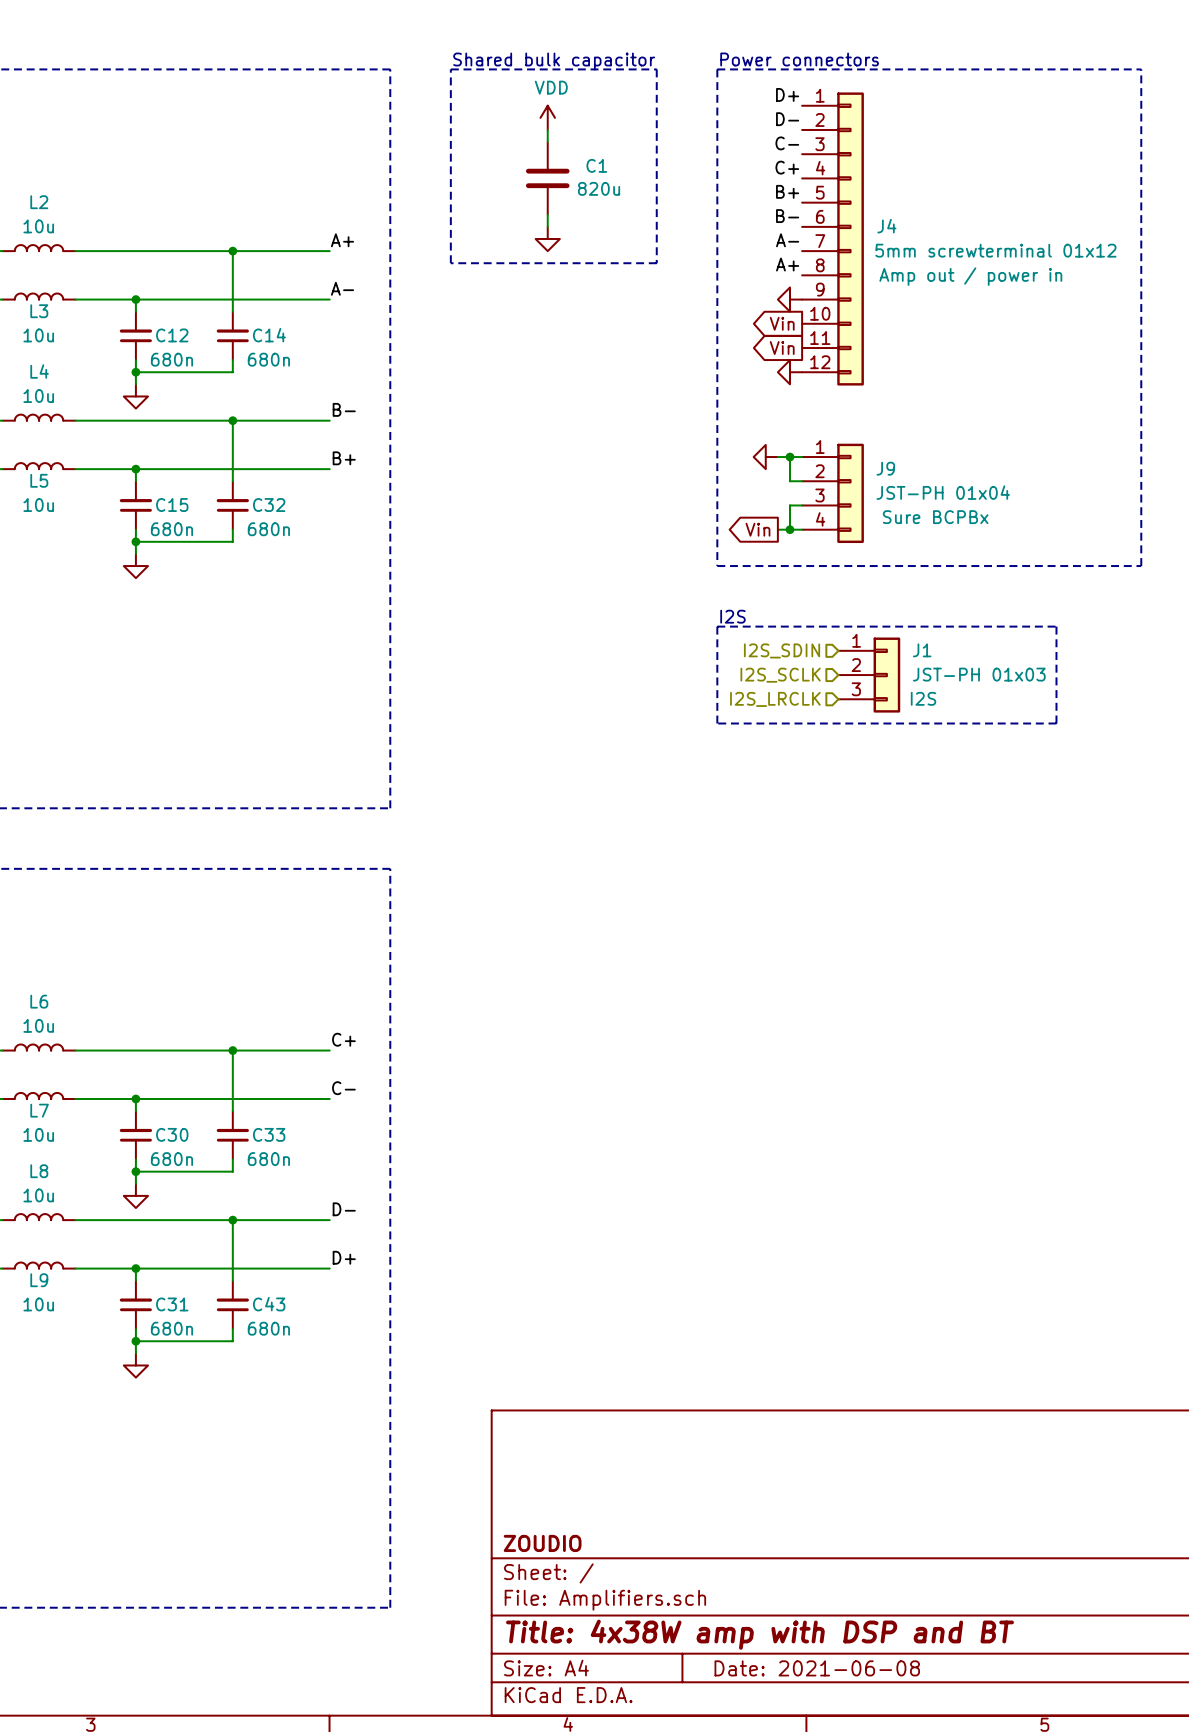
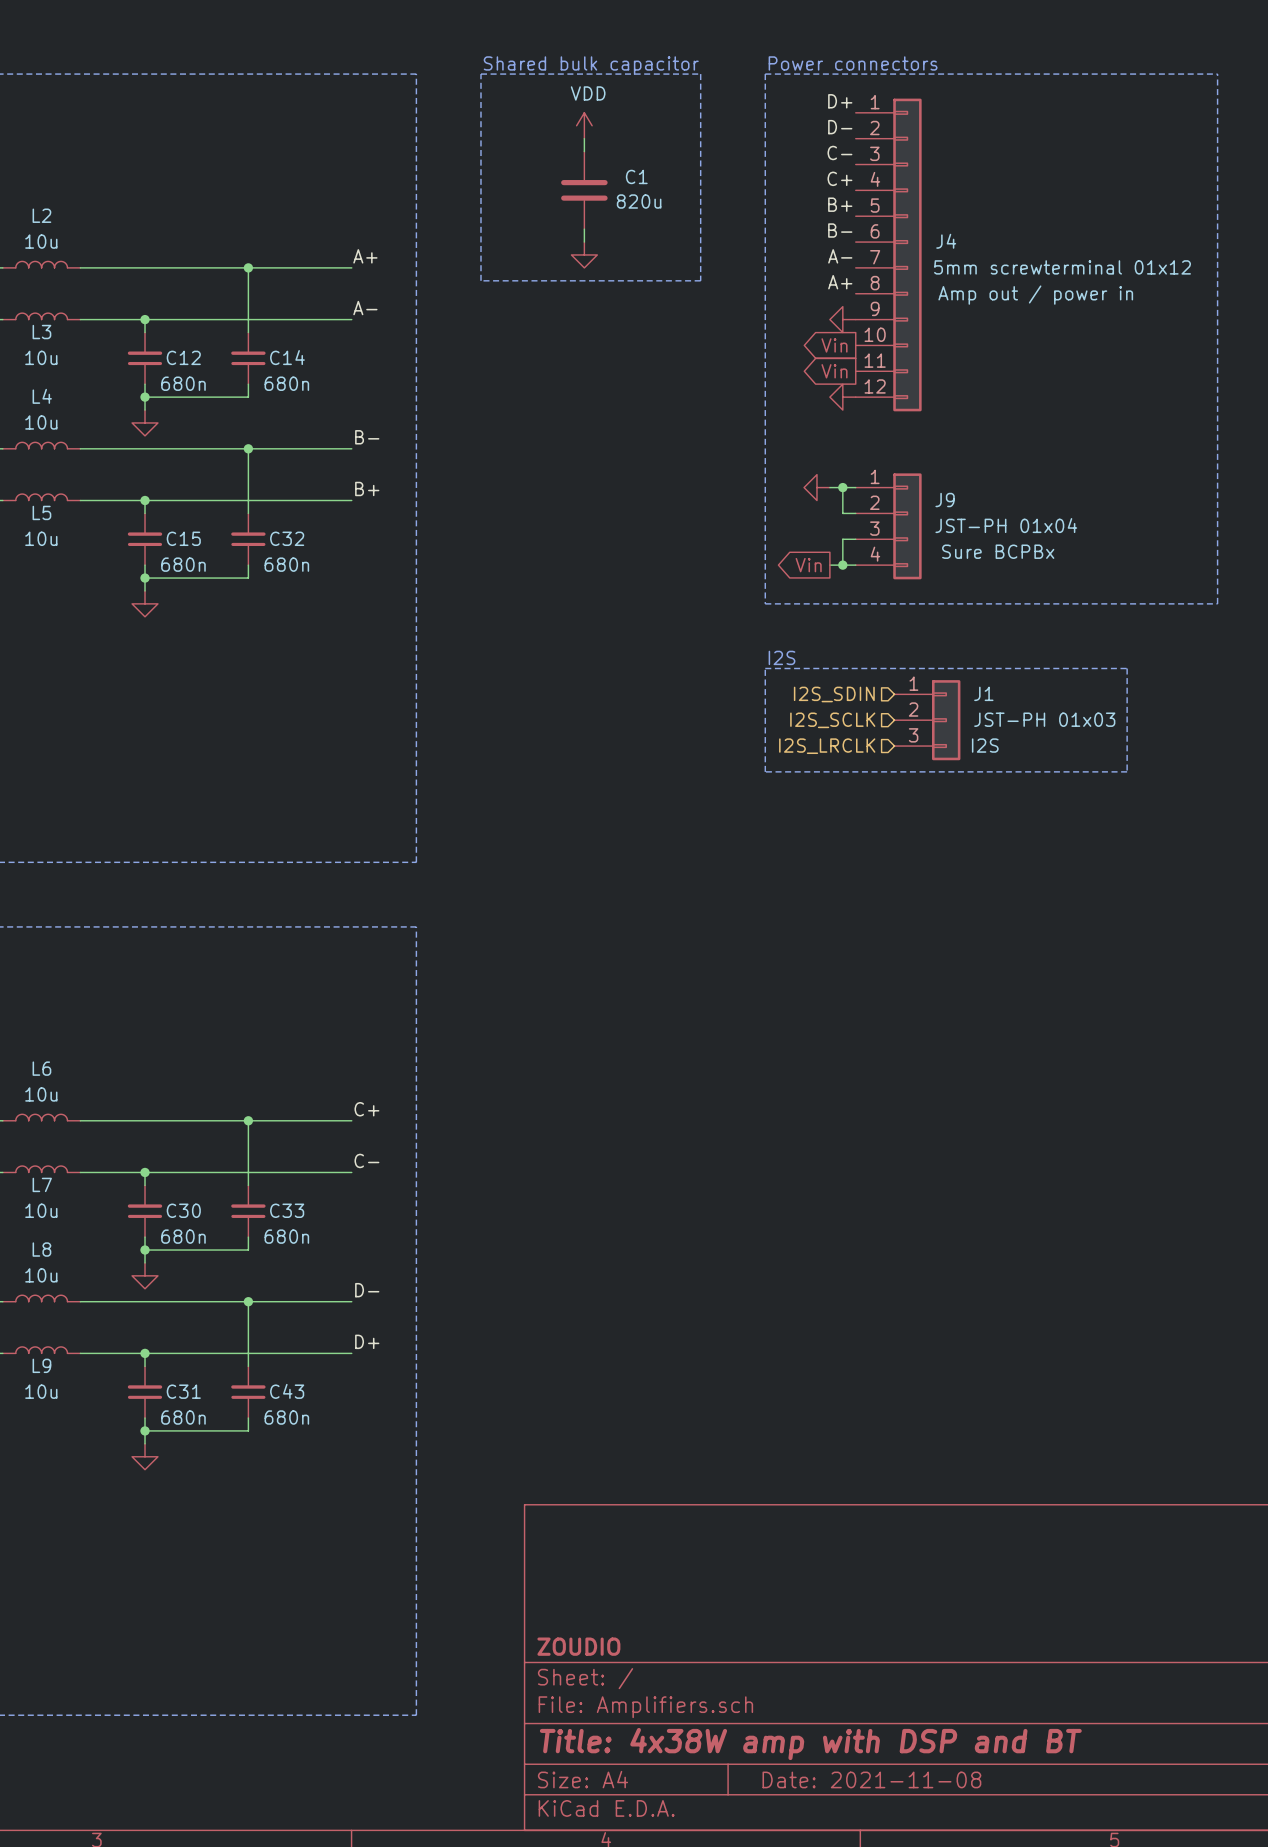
title block: Date: 2021-06-08 (817, 1668) -> Date: 2021-11-08 (871, 1779)

